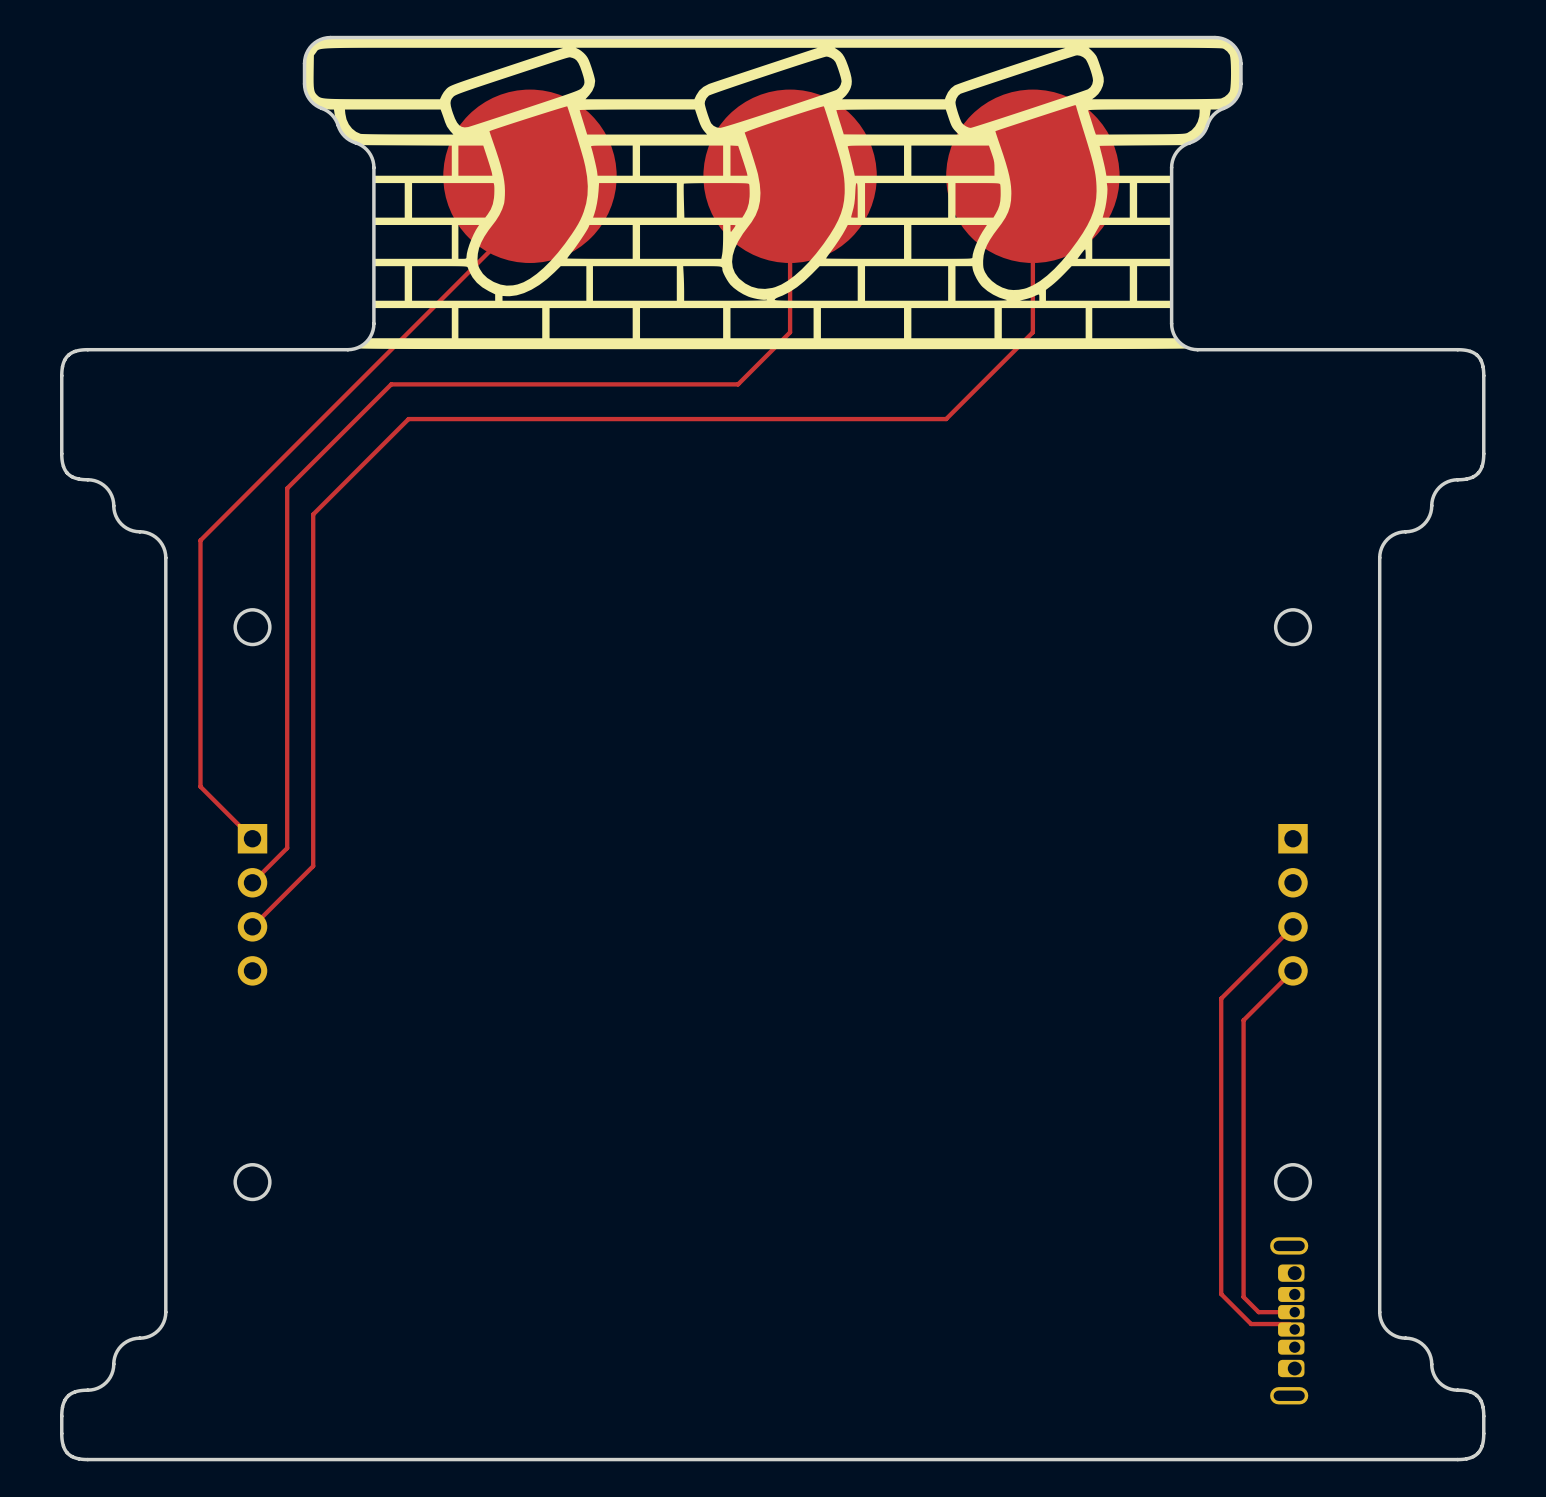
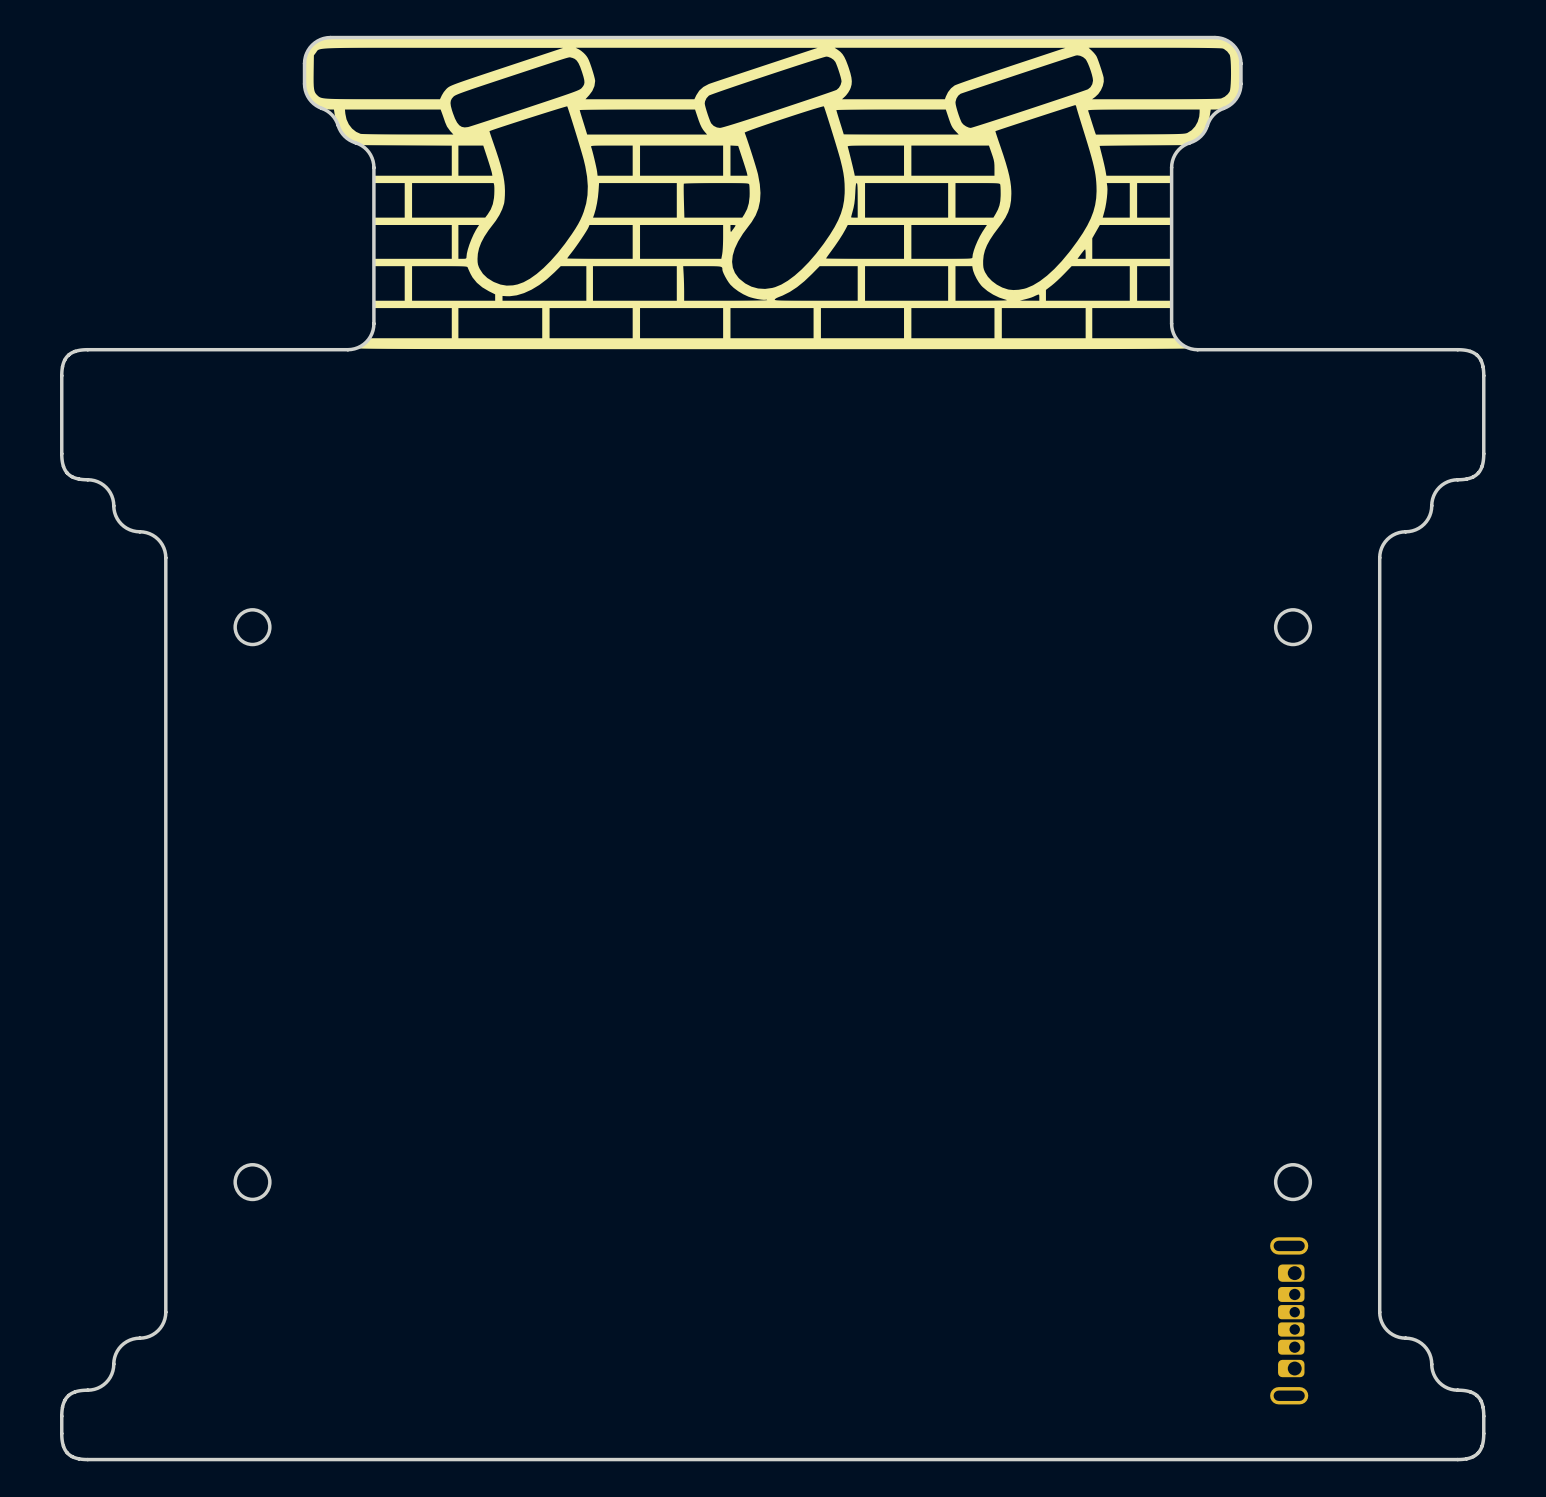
top track: (529, 176) (529, 210) (200, 540) (200, 786) (252, 838) -> none
part: (529, 176) -> none
top track: (790, 176) (790, 332) (738, 384) (391, 384) (287, 488) (287, 848) (252, 882) -> none
part: (790, 176) -> none
top track: (1032, 176) (1032, 332) (946, 419) (408, 419) (313, 514) (313, 866) (252, 926) -> none
part: (1032, 176) -> none
part: (252, 904) -> none
part: (1293, 904) -> none
top track: (1293, 926) (1221, 998) (1221, 1294) (1251, 1324) (1289, 1324) (1294, 1329) -> none
top track: (1293, 970) (1243, 1020) (1243, 1297) (1258, 1312) (1294, 1312) -> none

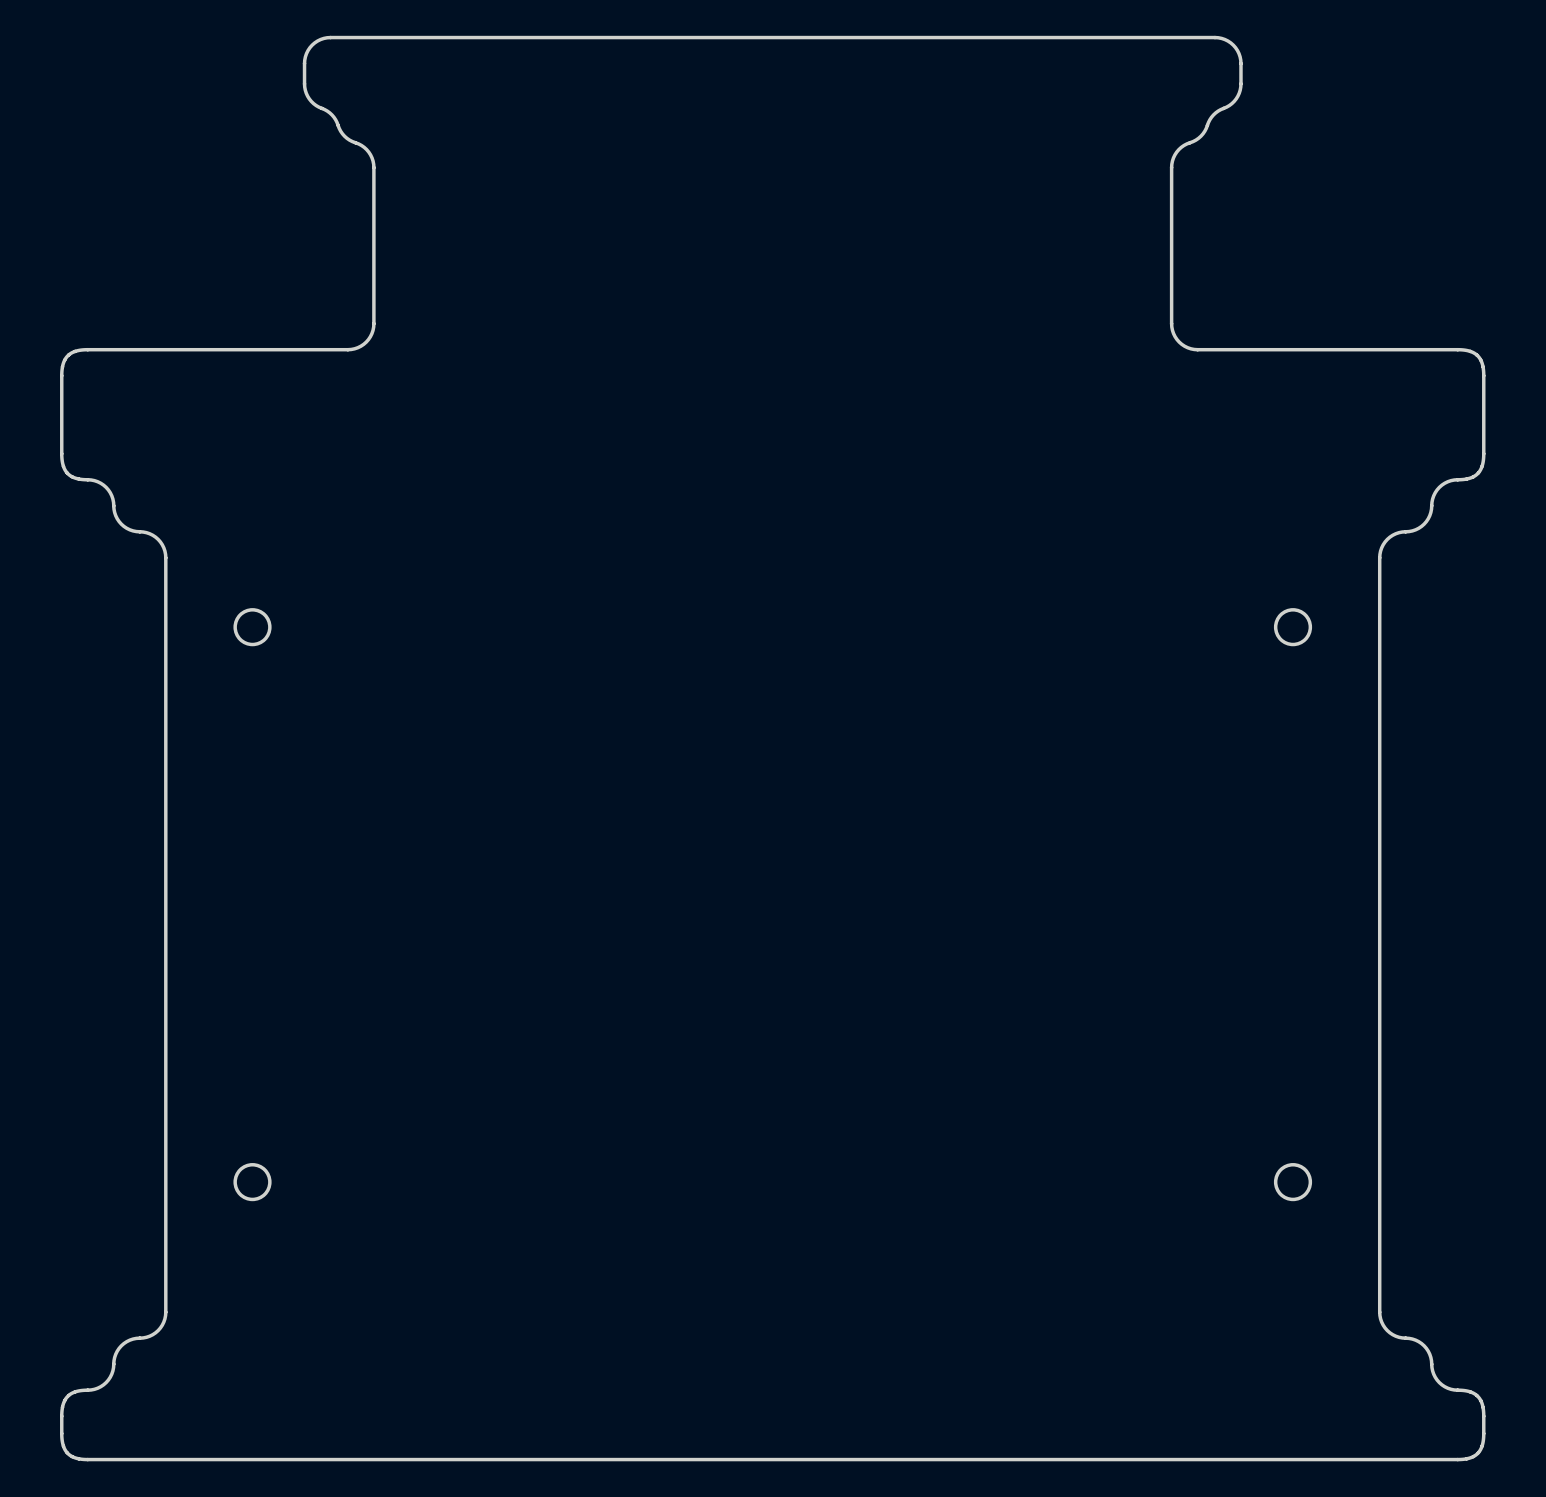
drawing: [304, 37, 1242, 350] -> none
part: (1289, 1320) -> none

